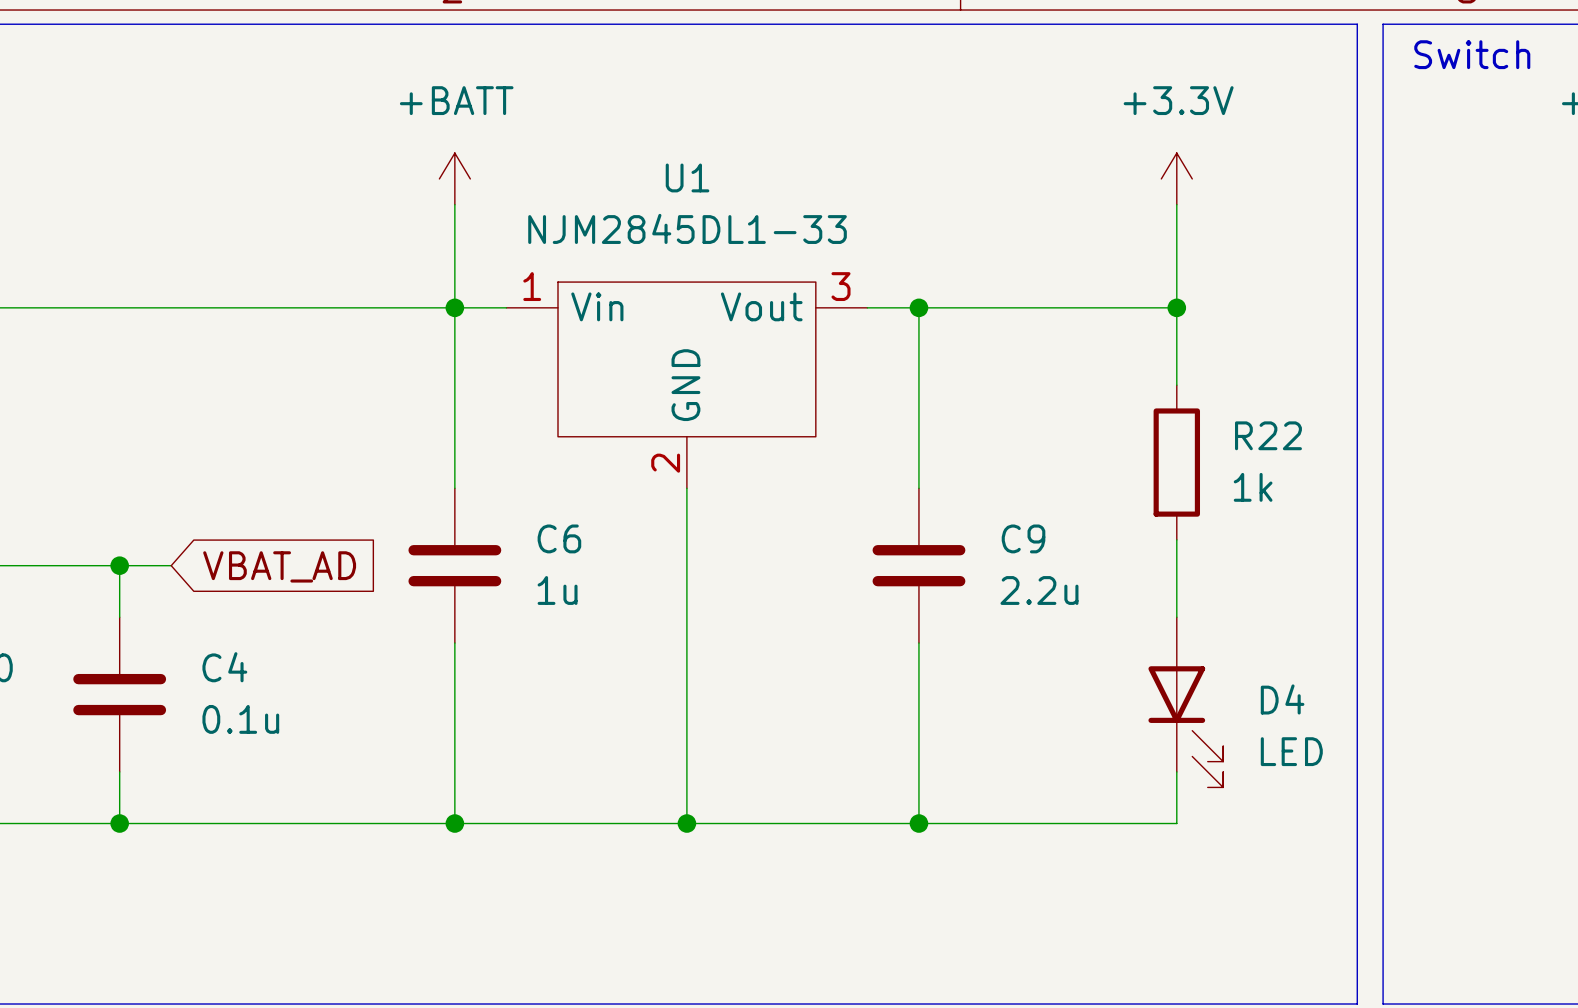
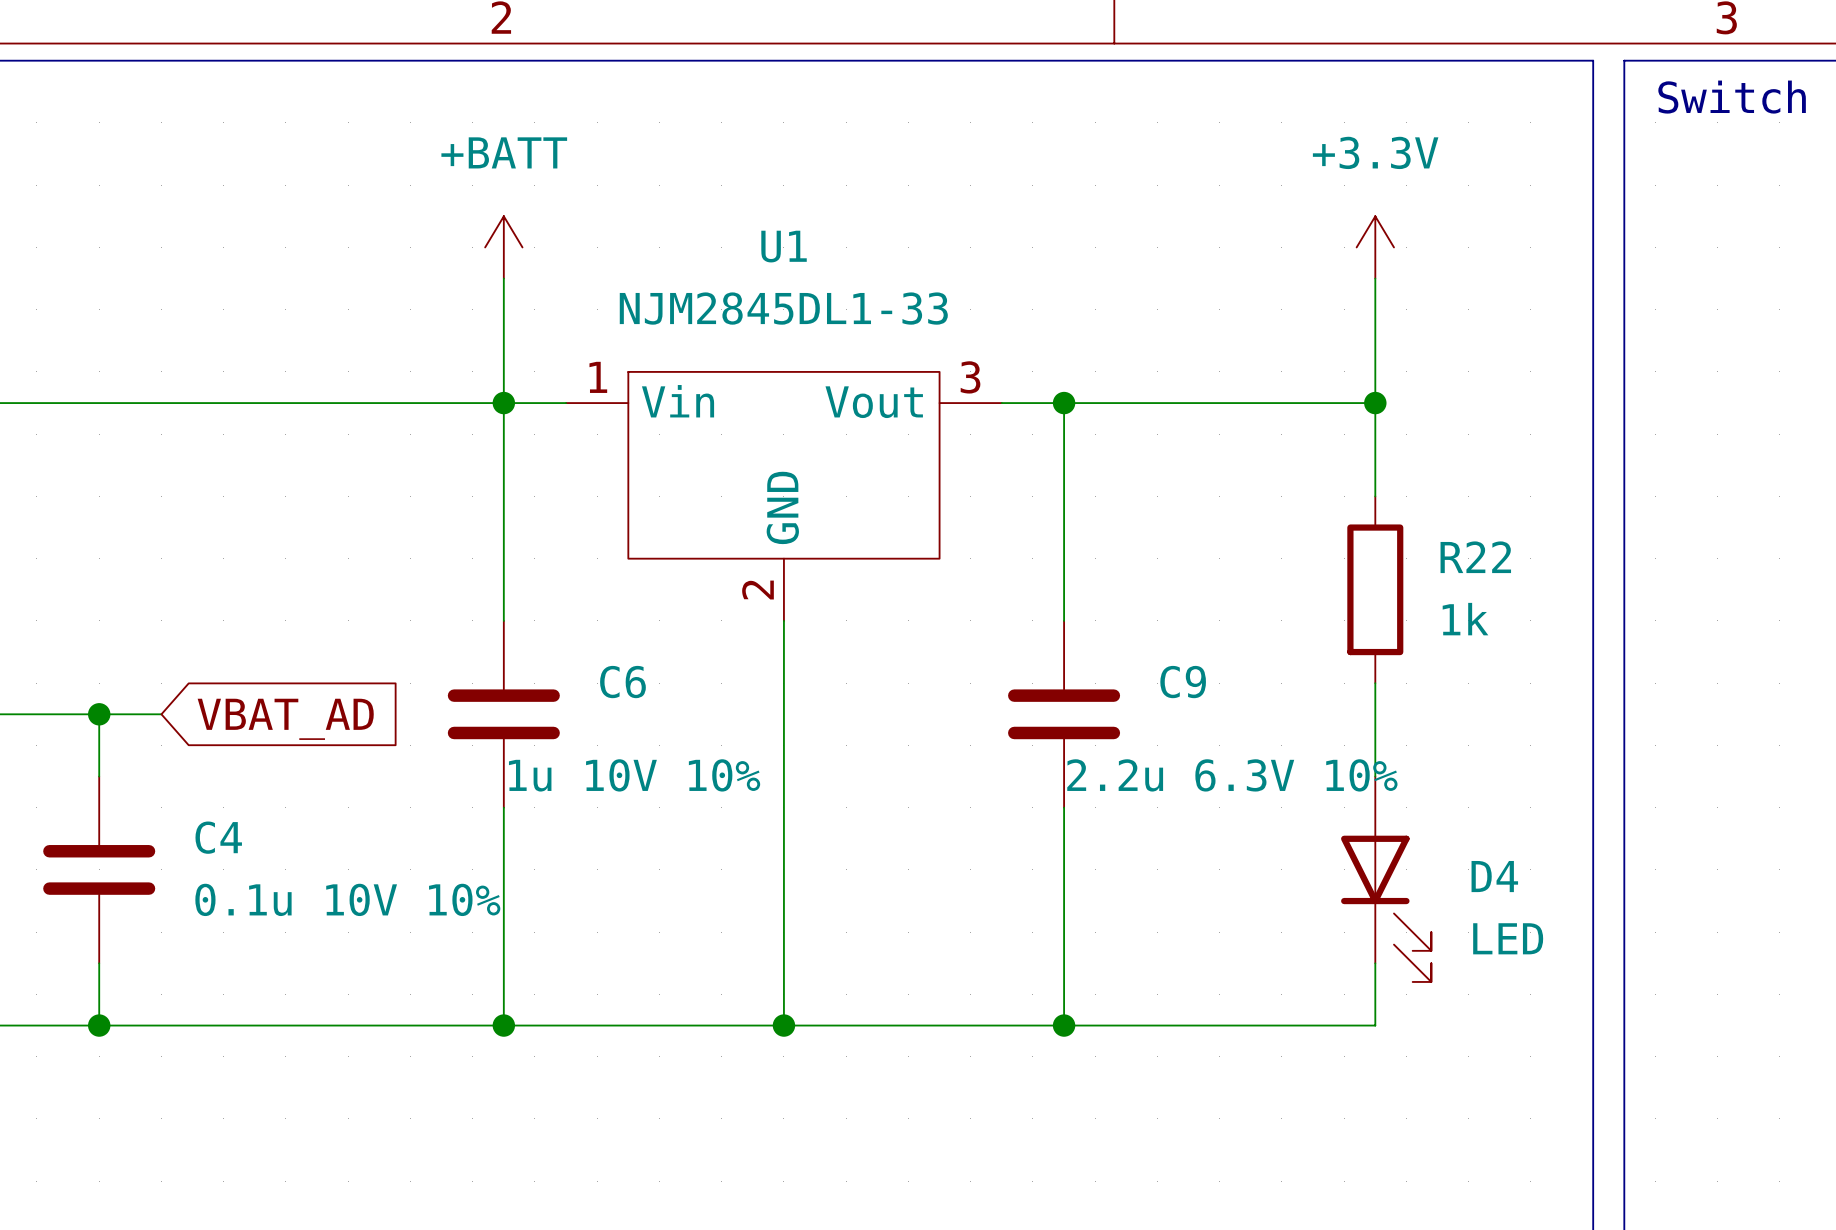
C6 value: 1u (557, 590) -> 1u 10V 10% (634, 775)
C9 value: 2.2u (1039, 590) -> 2.2u 6.3V 10% (1232, 775)
C4 value: 0.1u (240, 719) -> 0.1u 10V 10% (347, 899)

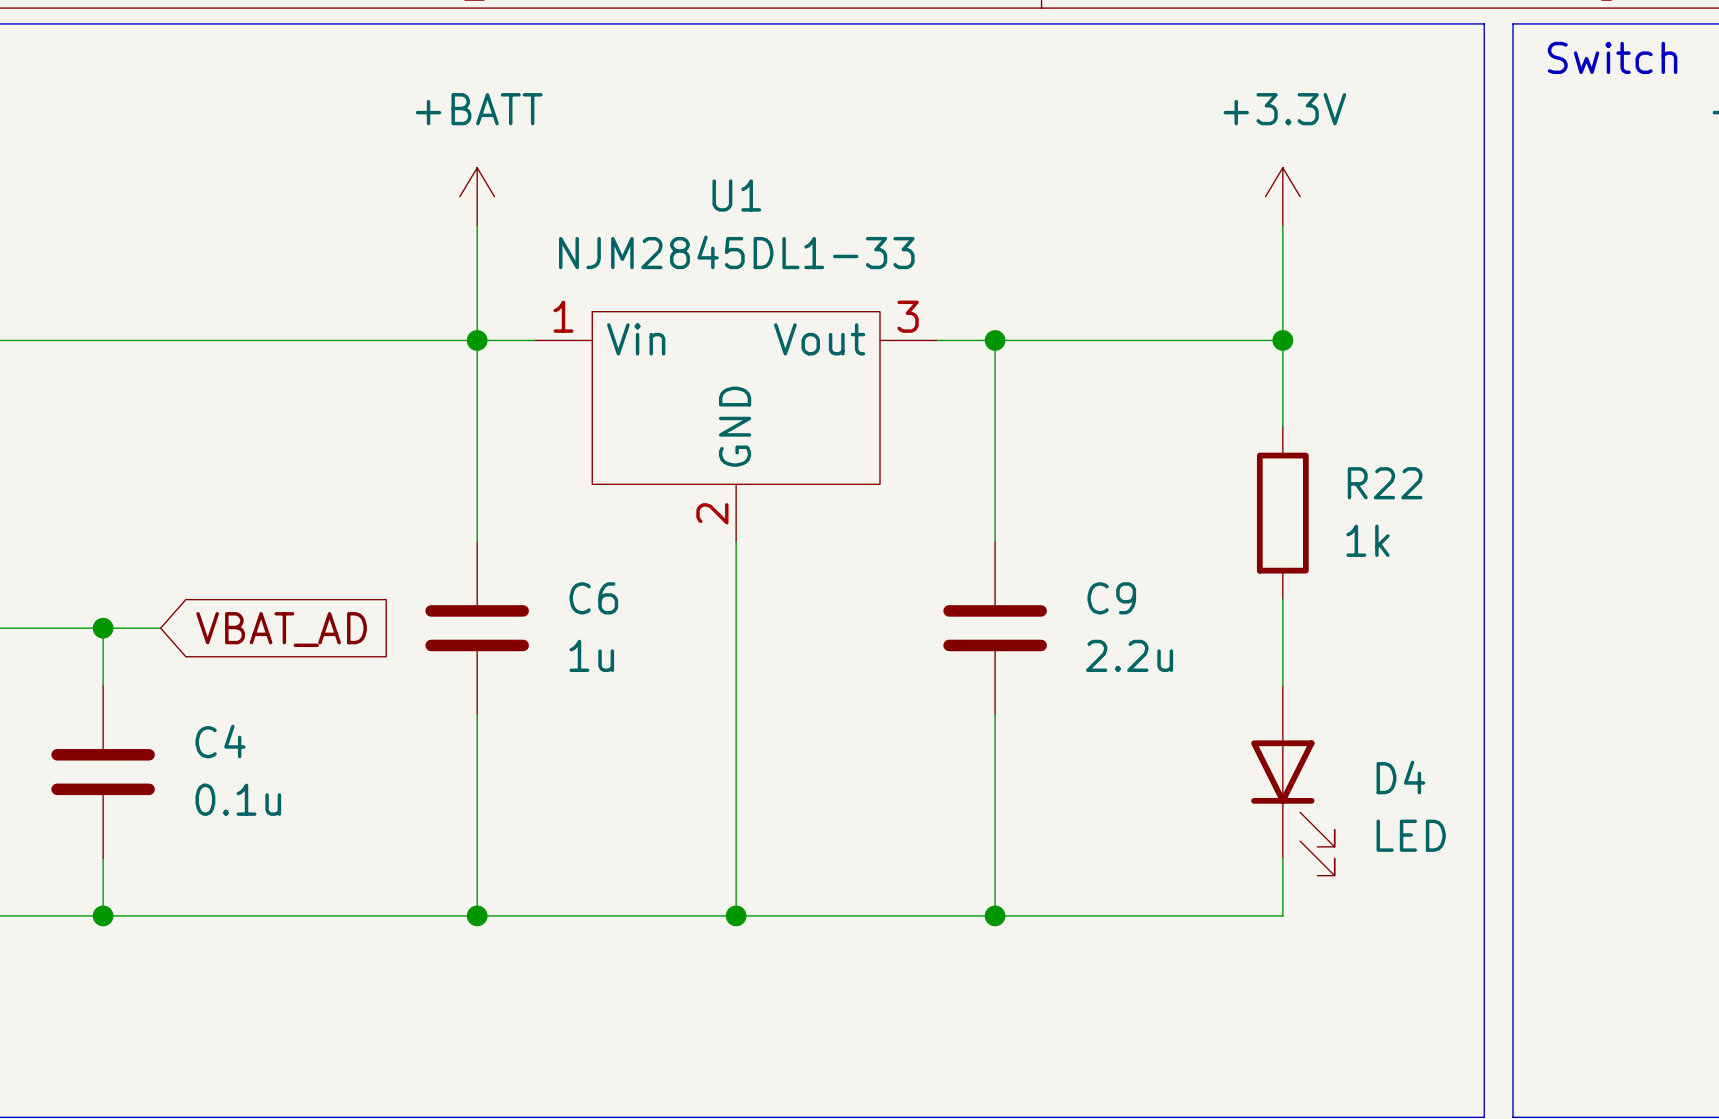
C6 value: 1u 10V 10% (634, 775) -> 1u (591, 655)
C9 value: 2.2u 6.3V 10% (1232, 775) -> 2.2u (1129, 655)
C4 value: 0.1u 10V 10% (347, 899) -> 0.1u (238, 799)

